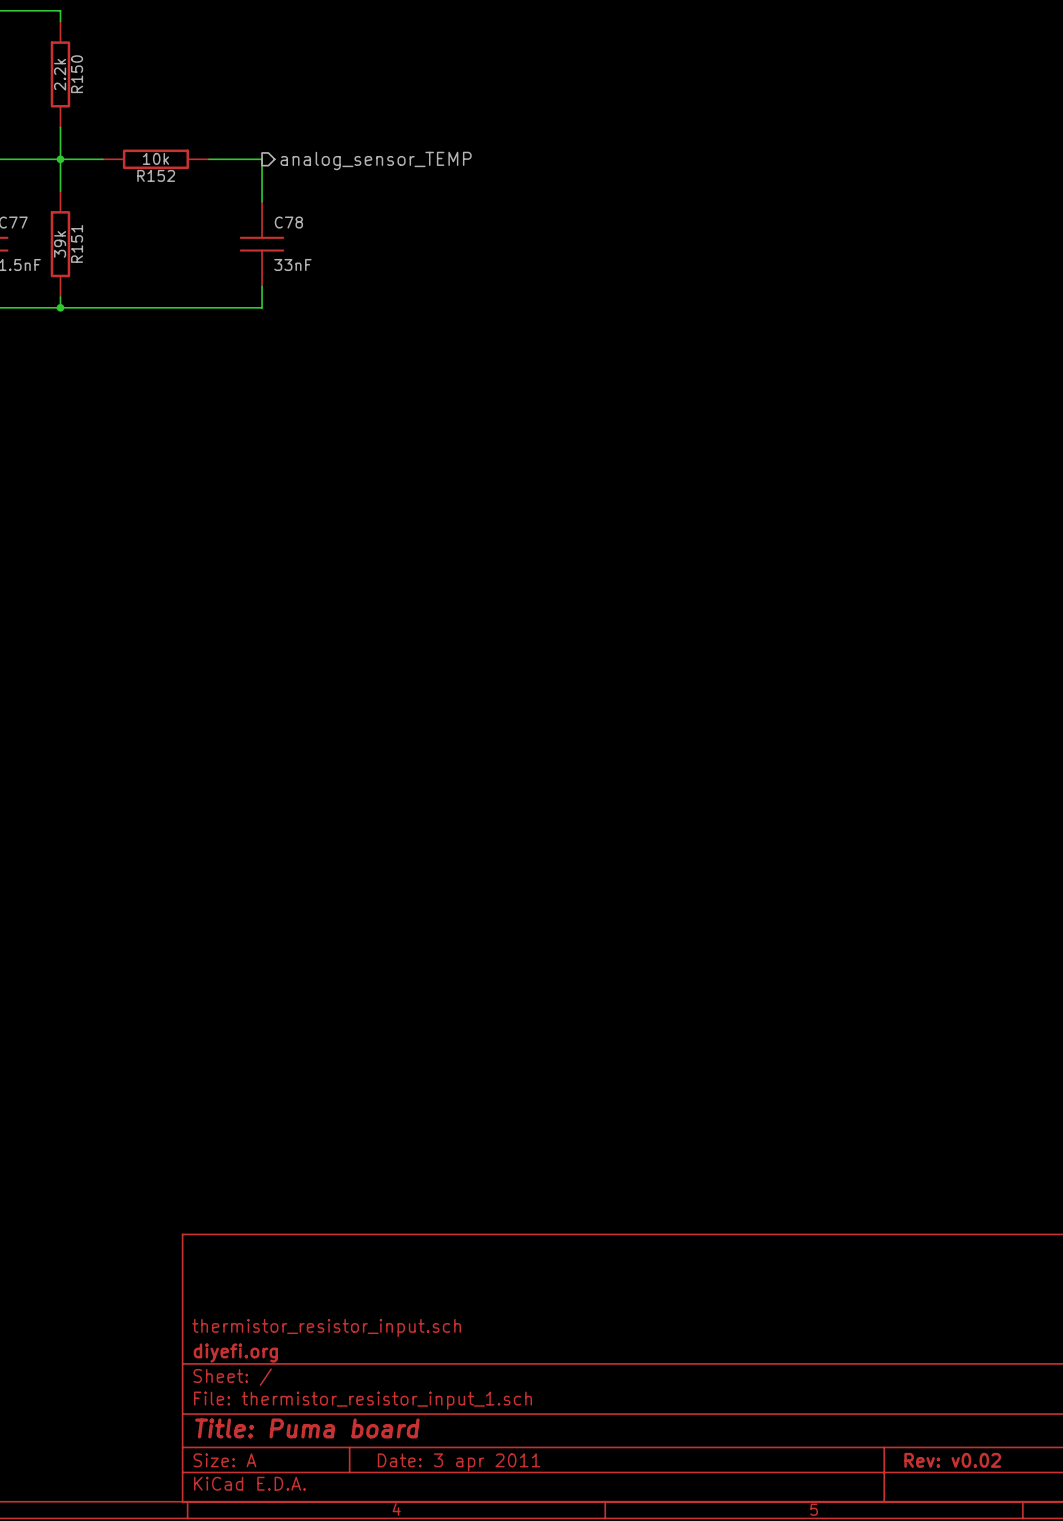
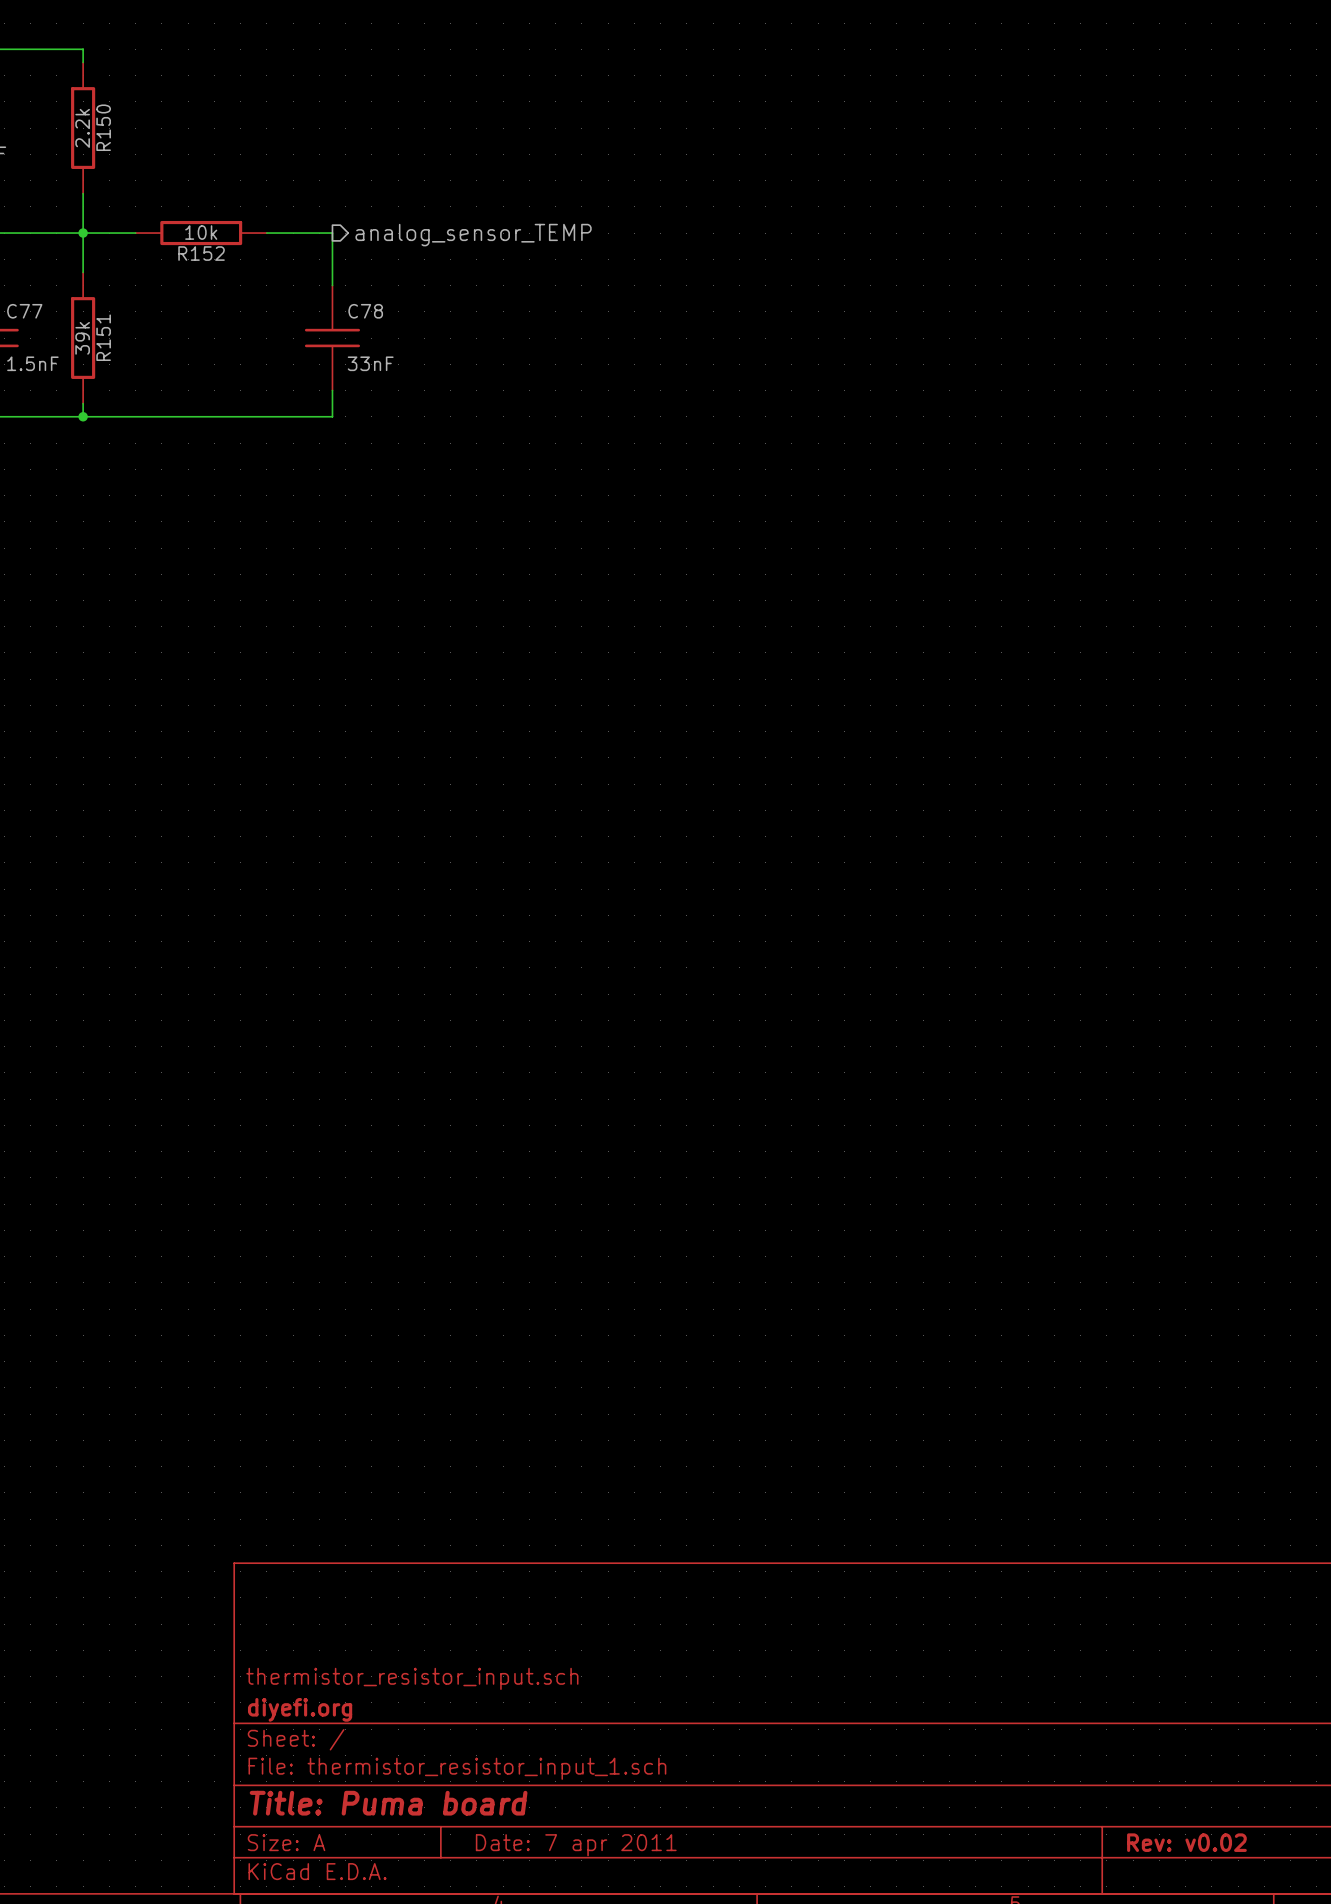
title block: Date: 3 apr 2011 (459, 1462) -> Date: 7 apr 2011 (576, 1845)

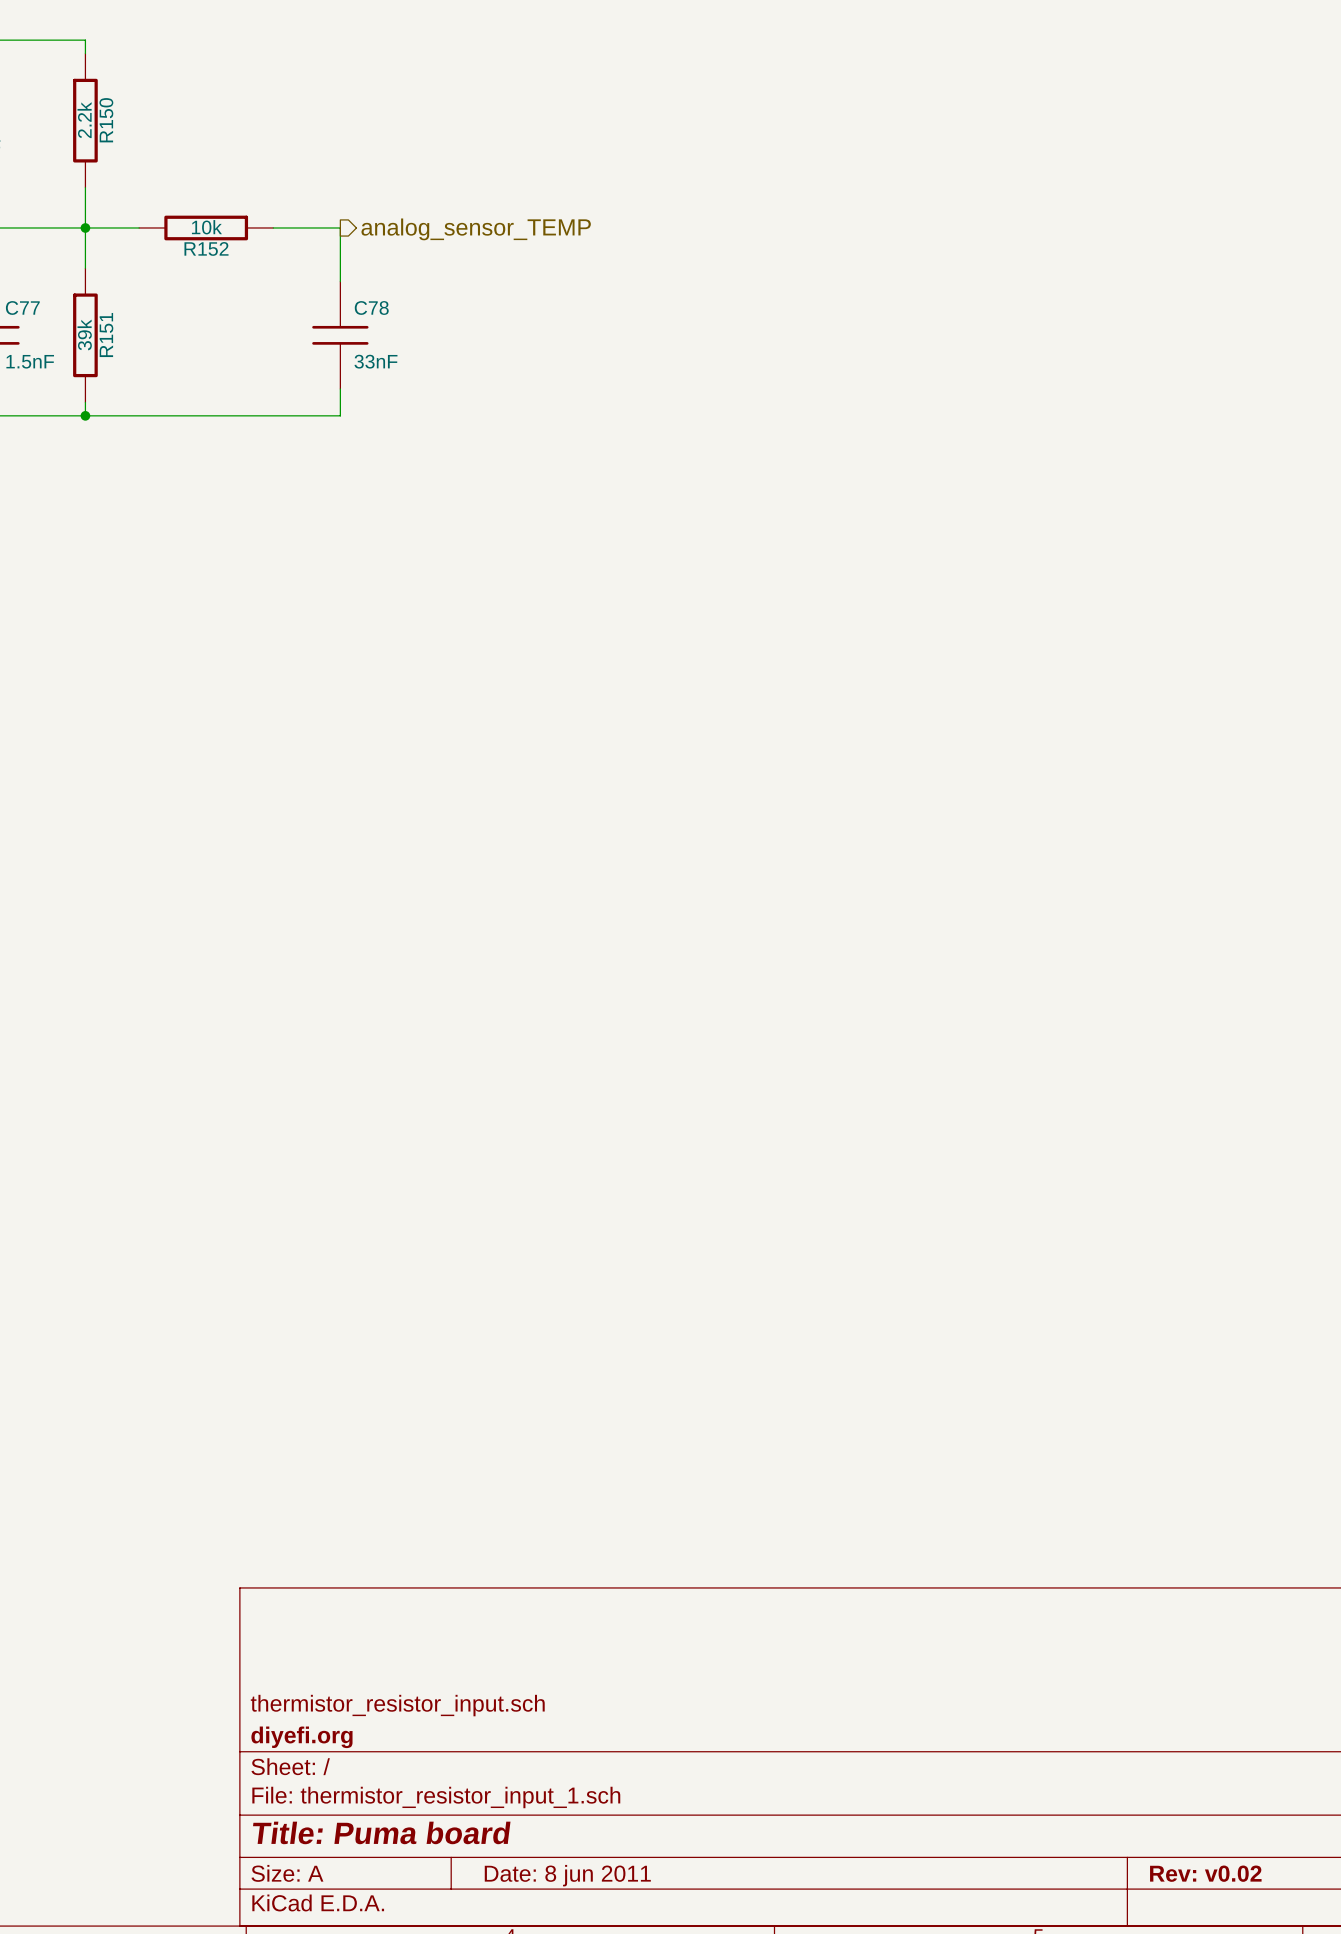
title block: Date: 7 apr 2011 (576, 1845) -> Date: 8 jun 2011 (567, 1875)

